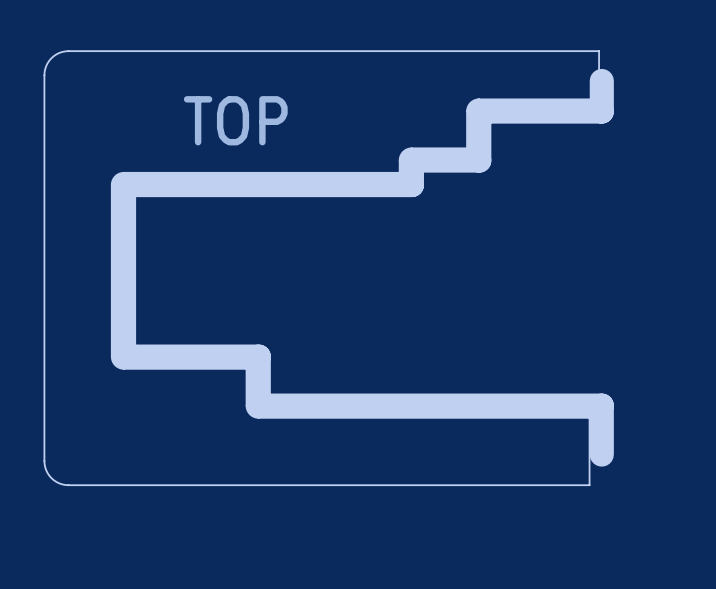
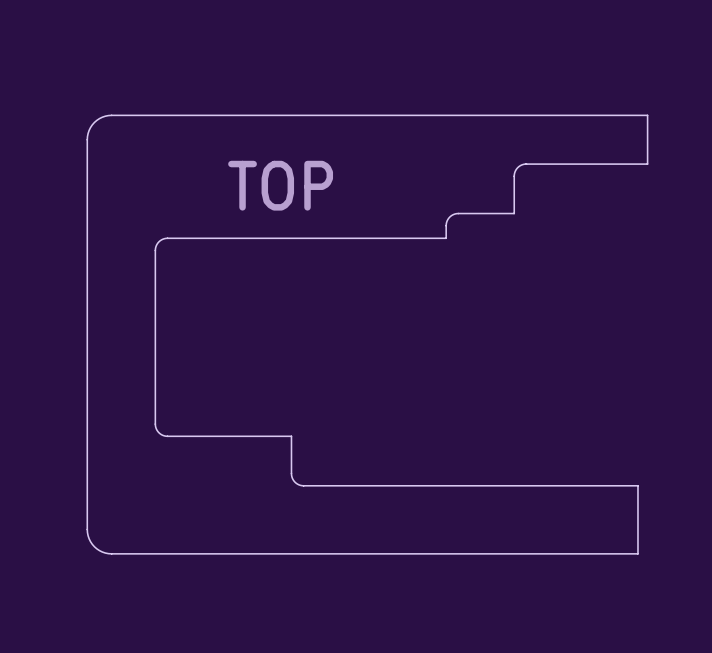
board edge: (601, 80) (601, 111) (479, 111) (479, 160) (411, 160) (411, 185) (124, 185) (124, 356) (258, 356) (258, 405) (601, 405) (601, 454) -> none

